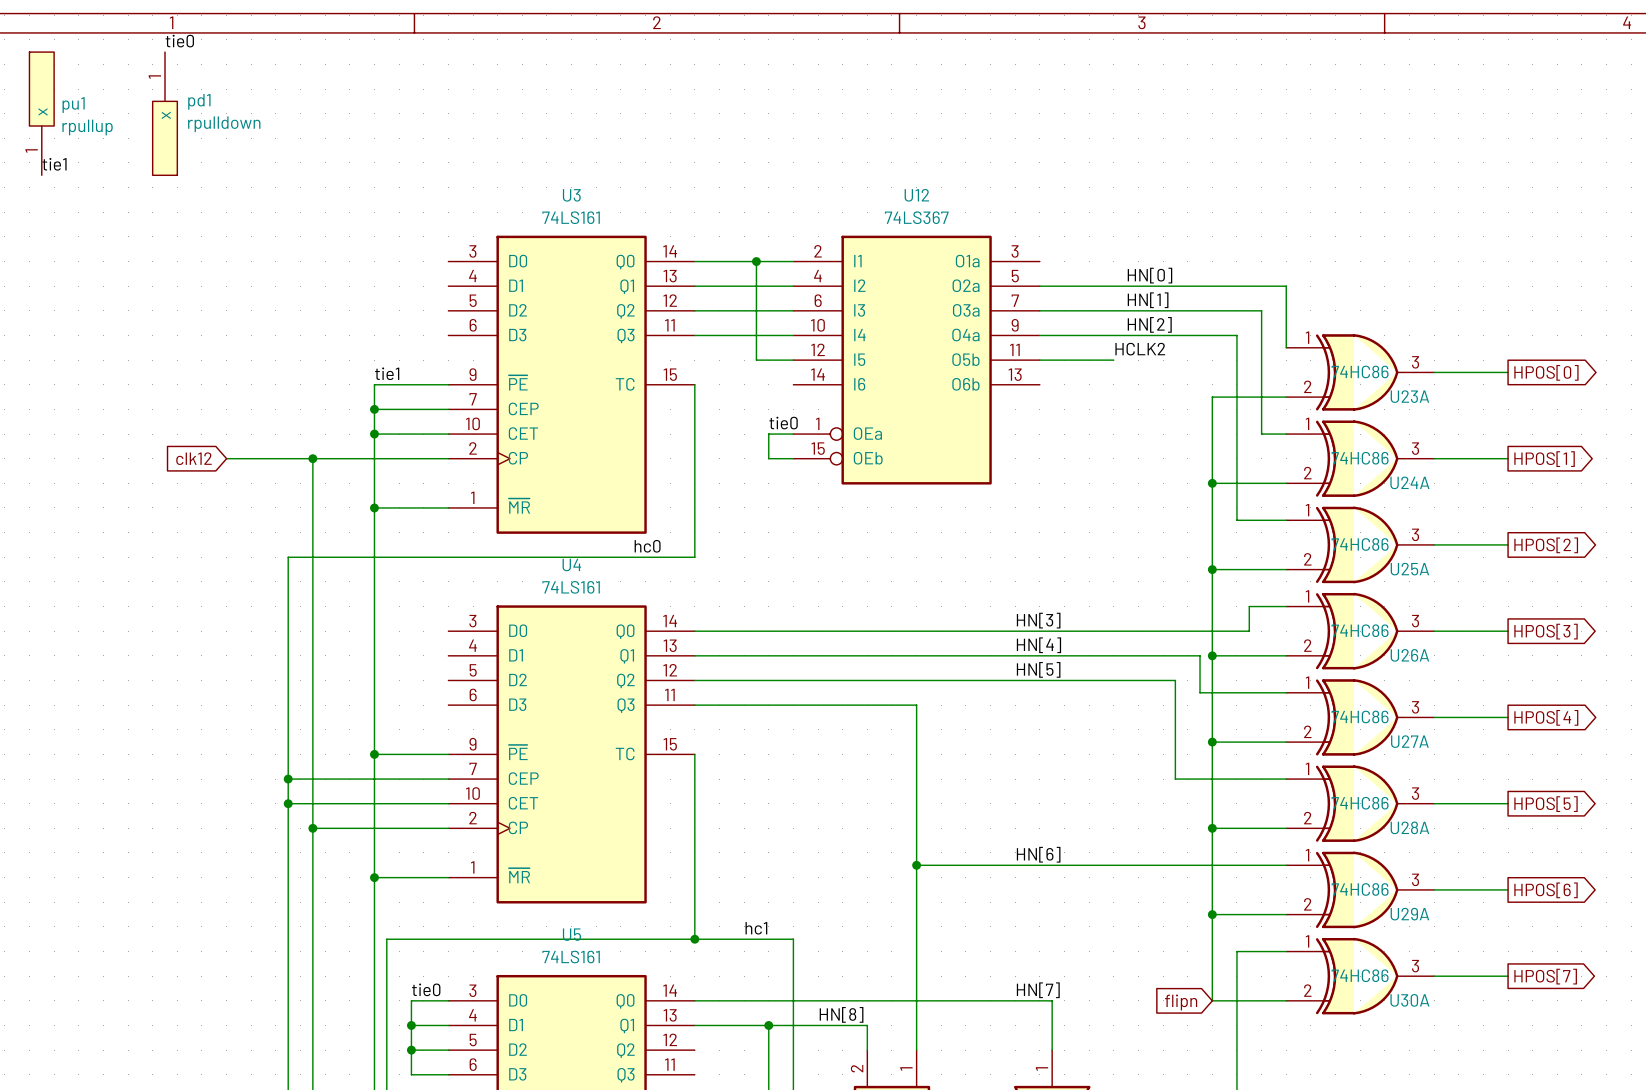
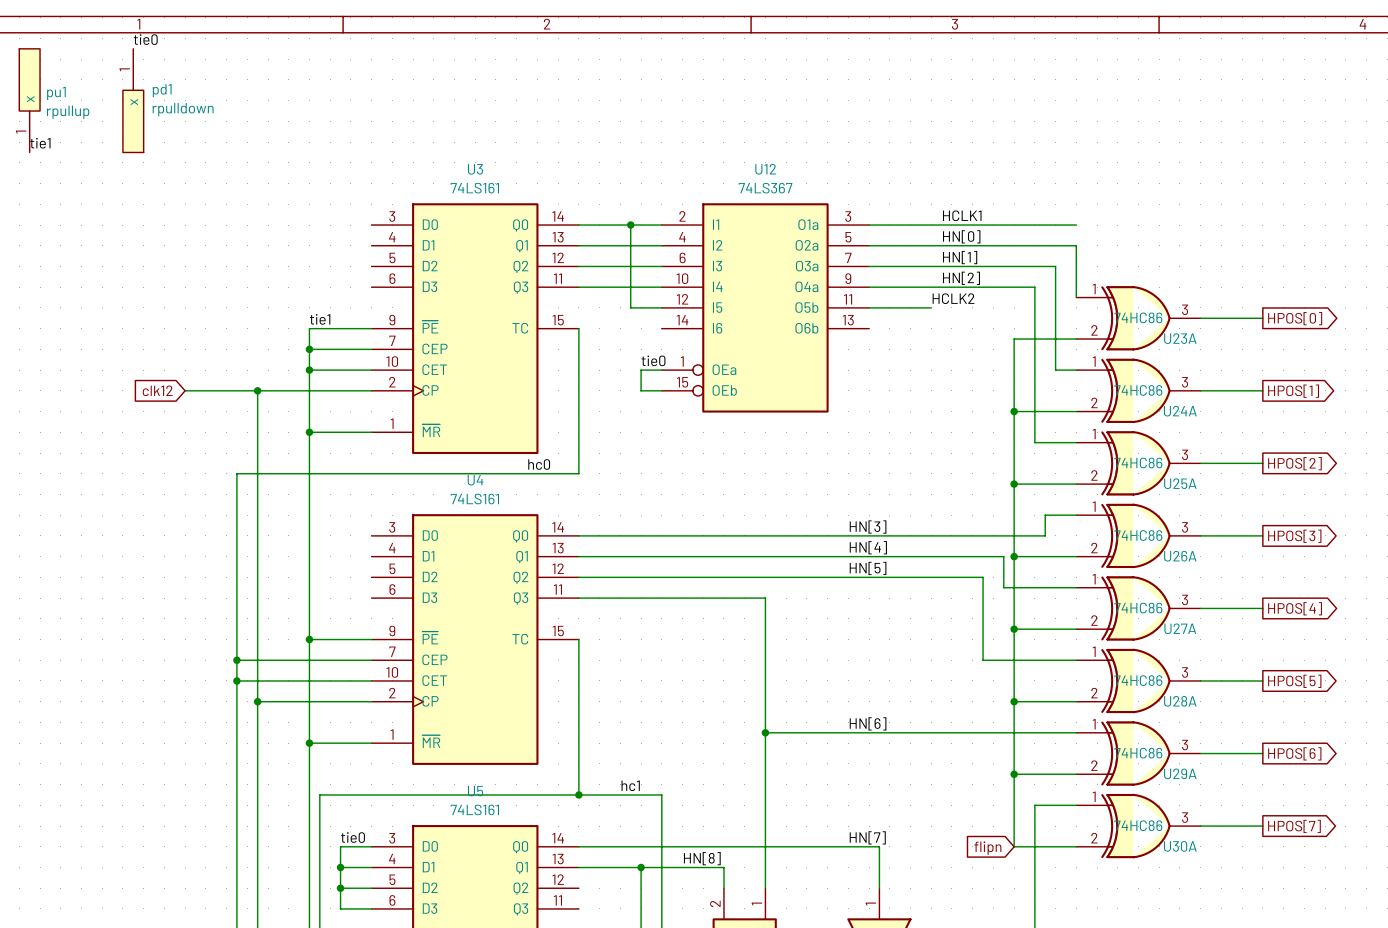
label: none -> HCLK1 (962, 215)
wire: none -> (869, 225) (1076, 225)

